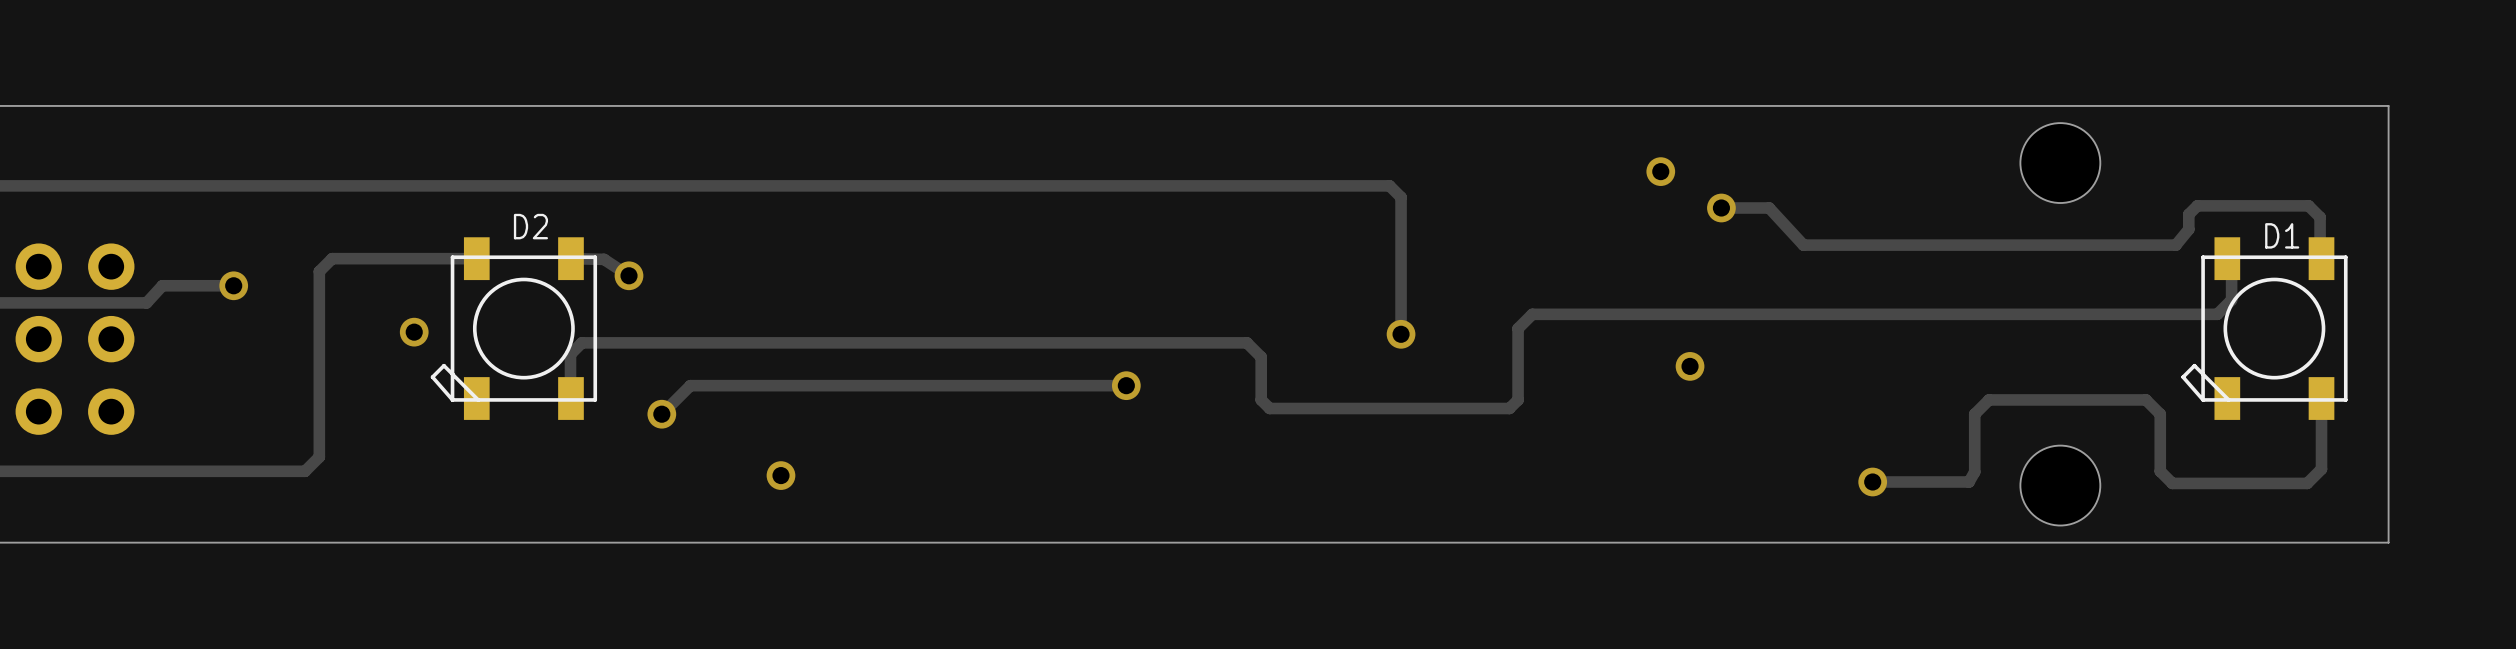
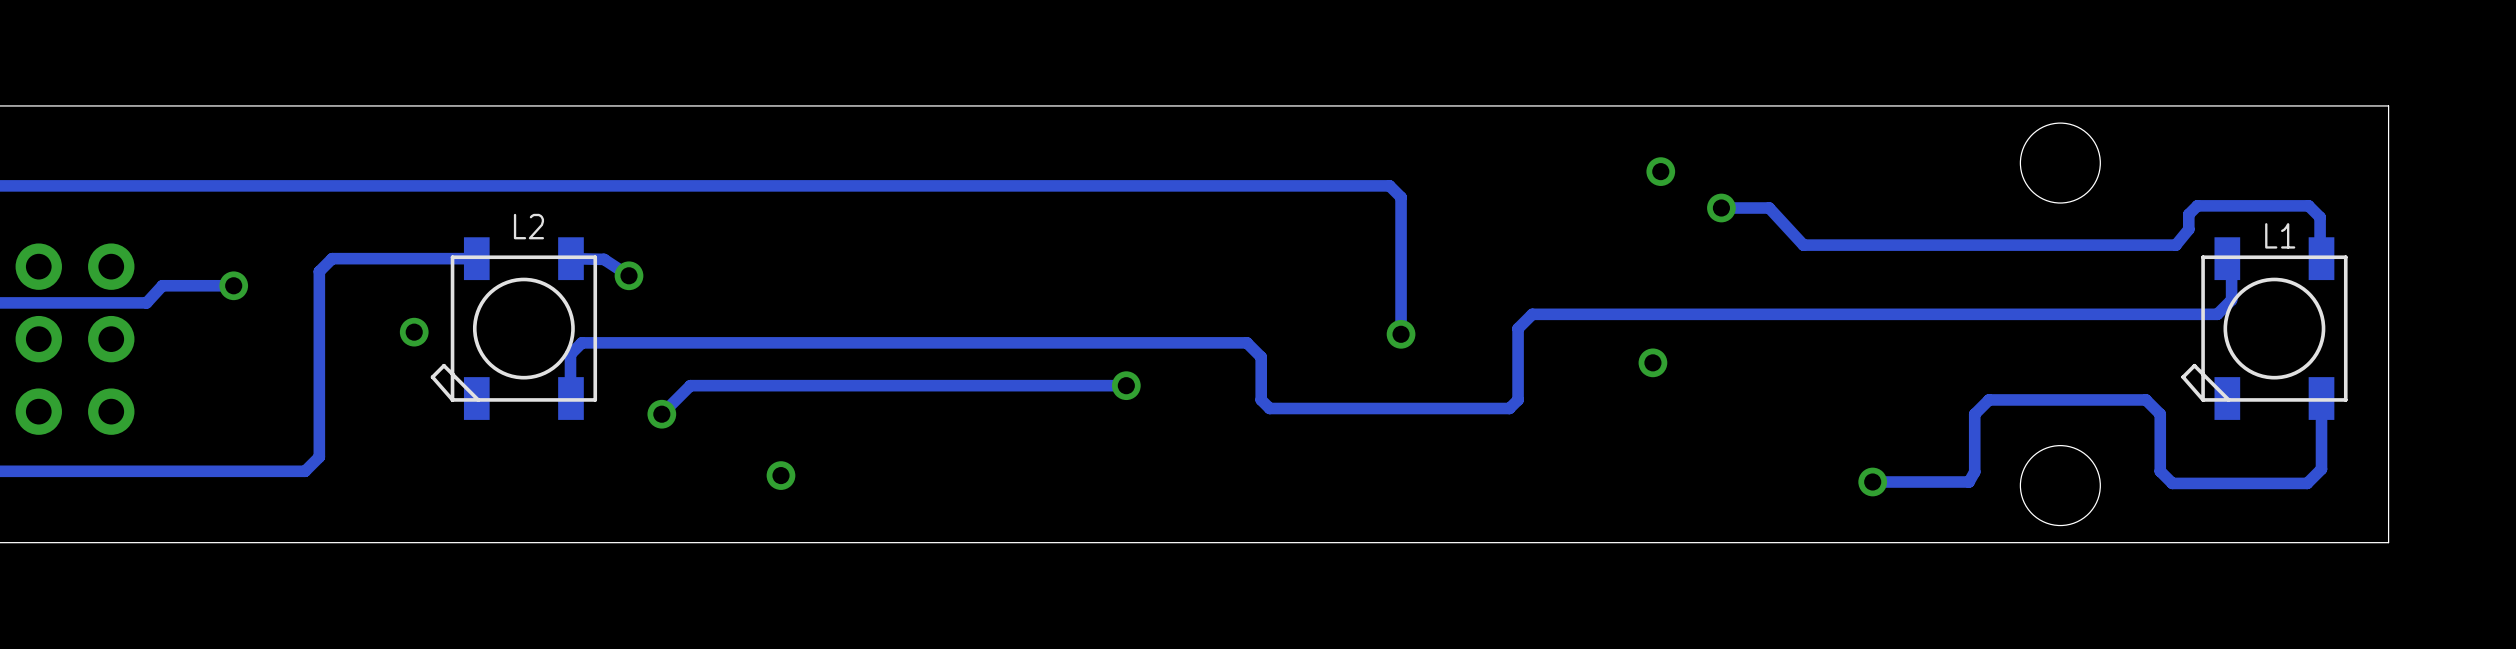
D2 name: D2 (530, 226) -> L2 (528, 226)
D1 name: D1 (2282, 235) -> L1 (2280, 235)
via position: (1690, 366) -> (1652, 362)

